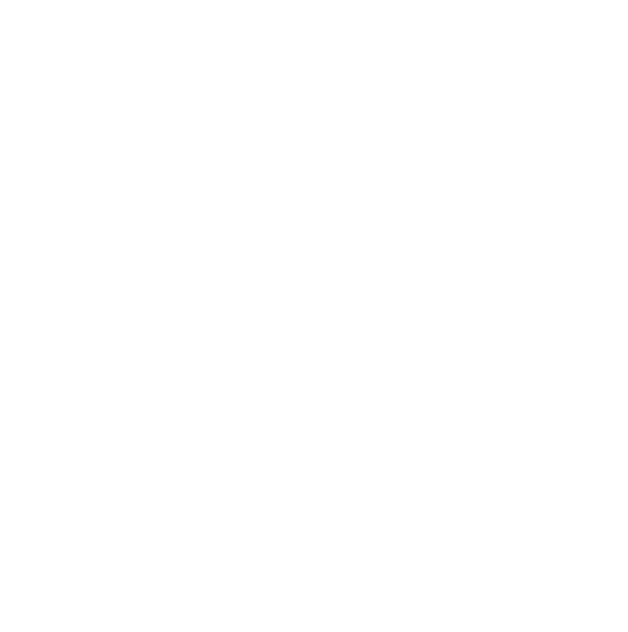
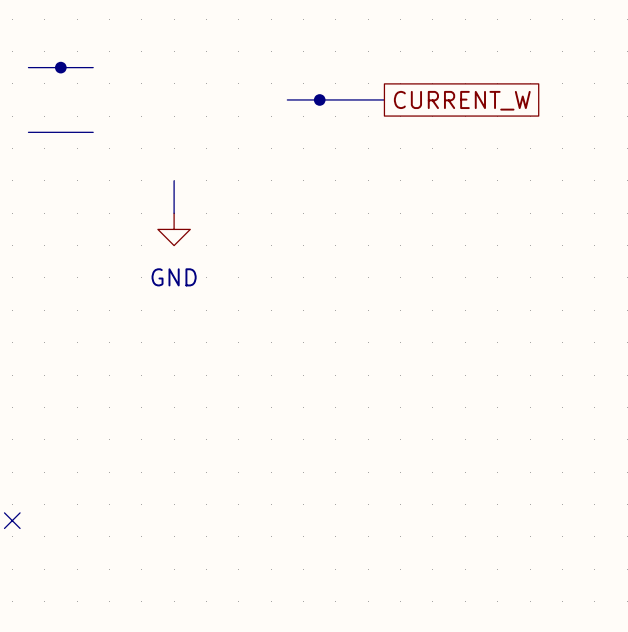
wire: none -> (28, 67) (93, 67)
junction: none -> (60, 67)
wire: none -> (287, 99) (384, 99)
junction: none -> (319, 99)
global label: none -> CURRENT_W (462, 100)
wire: none -> (28, 132) (93, 132)
wire: none -> (174, 180) (174, 213)
power symbol: none -> GND (174, 229)
no-connect mark: none -> (12, 520)

